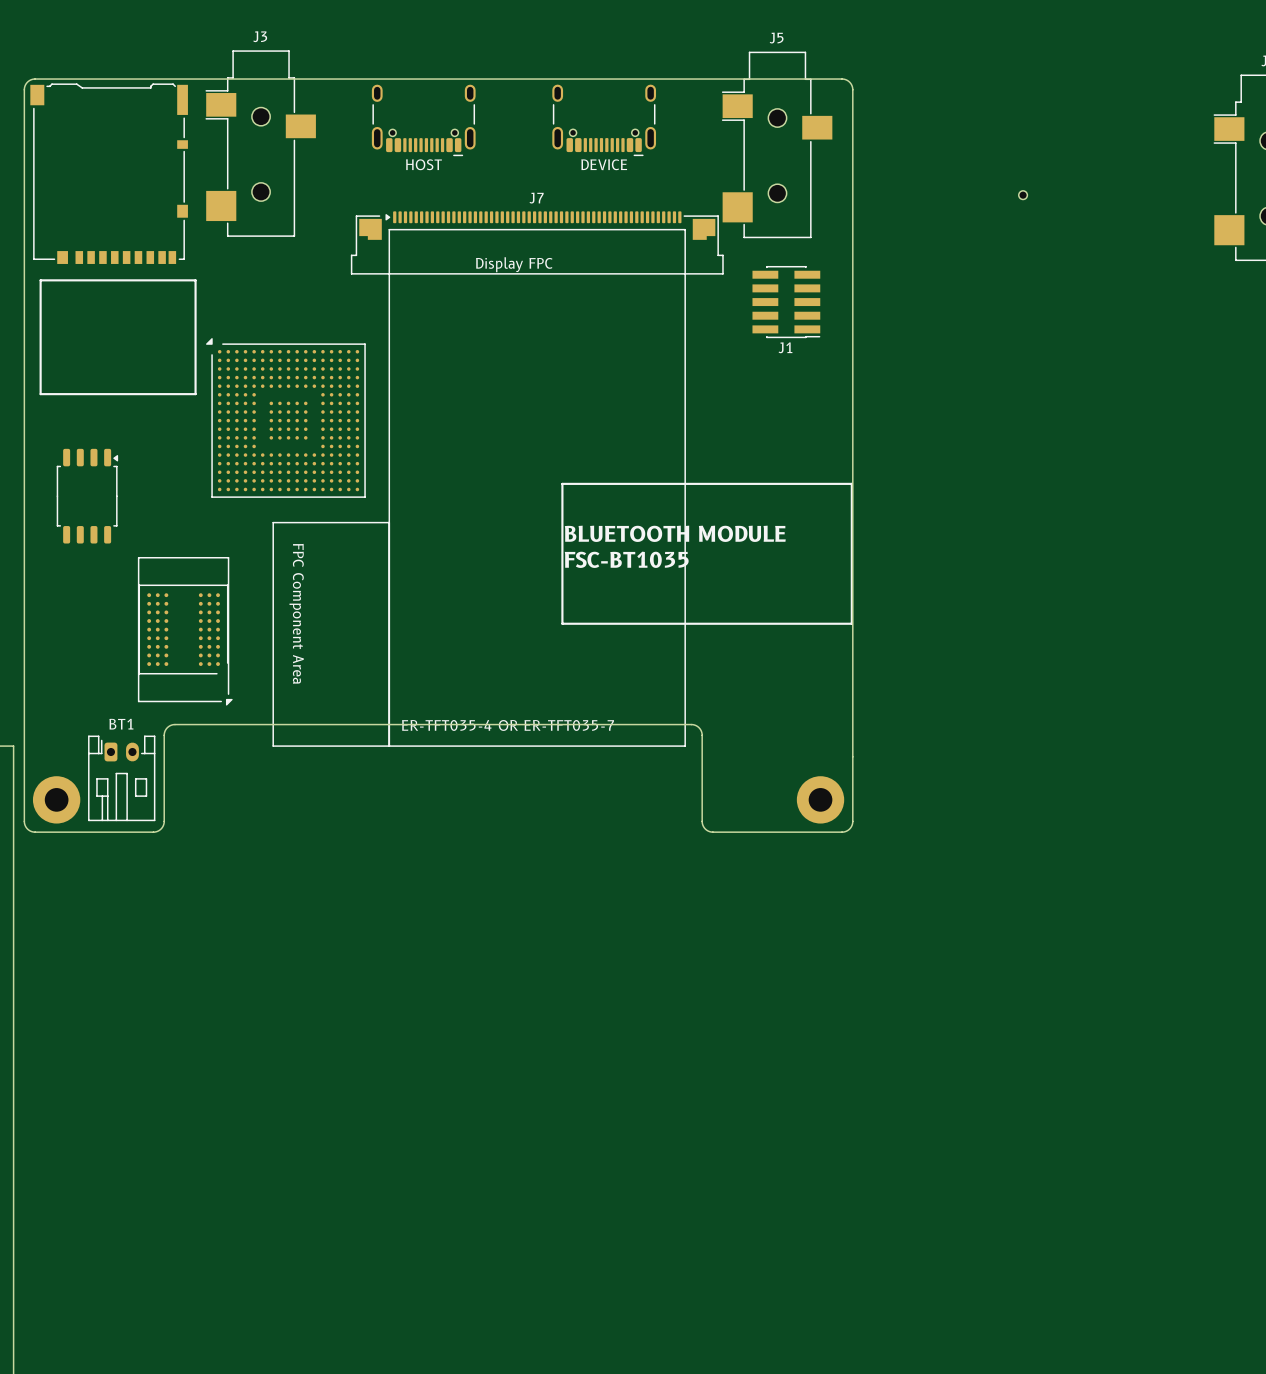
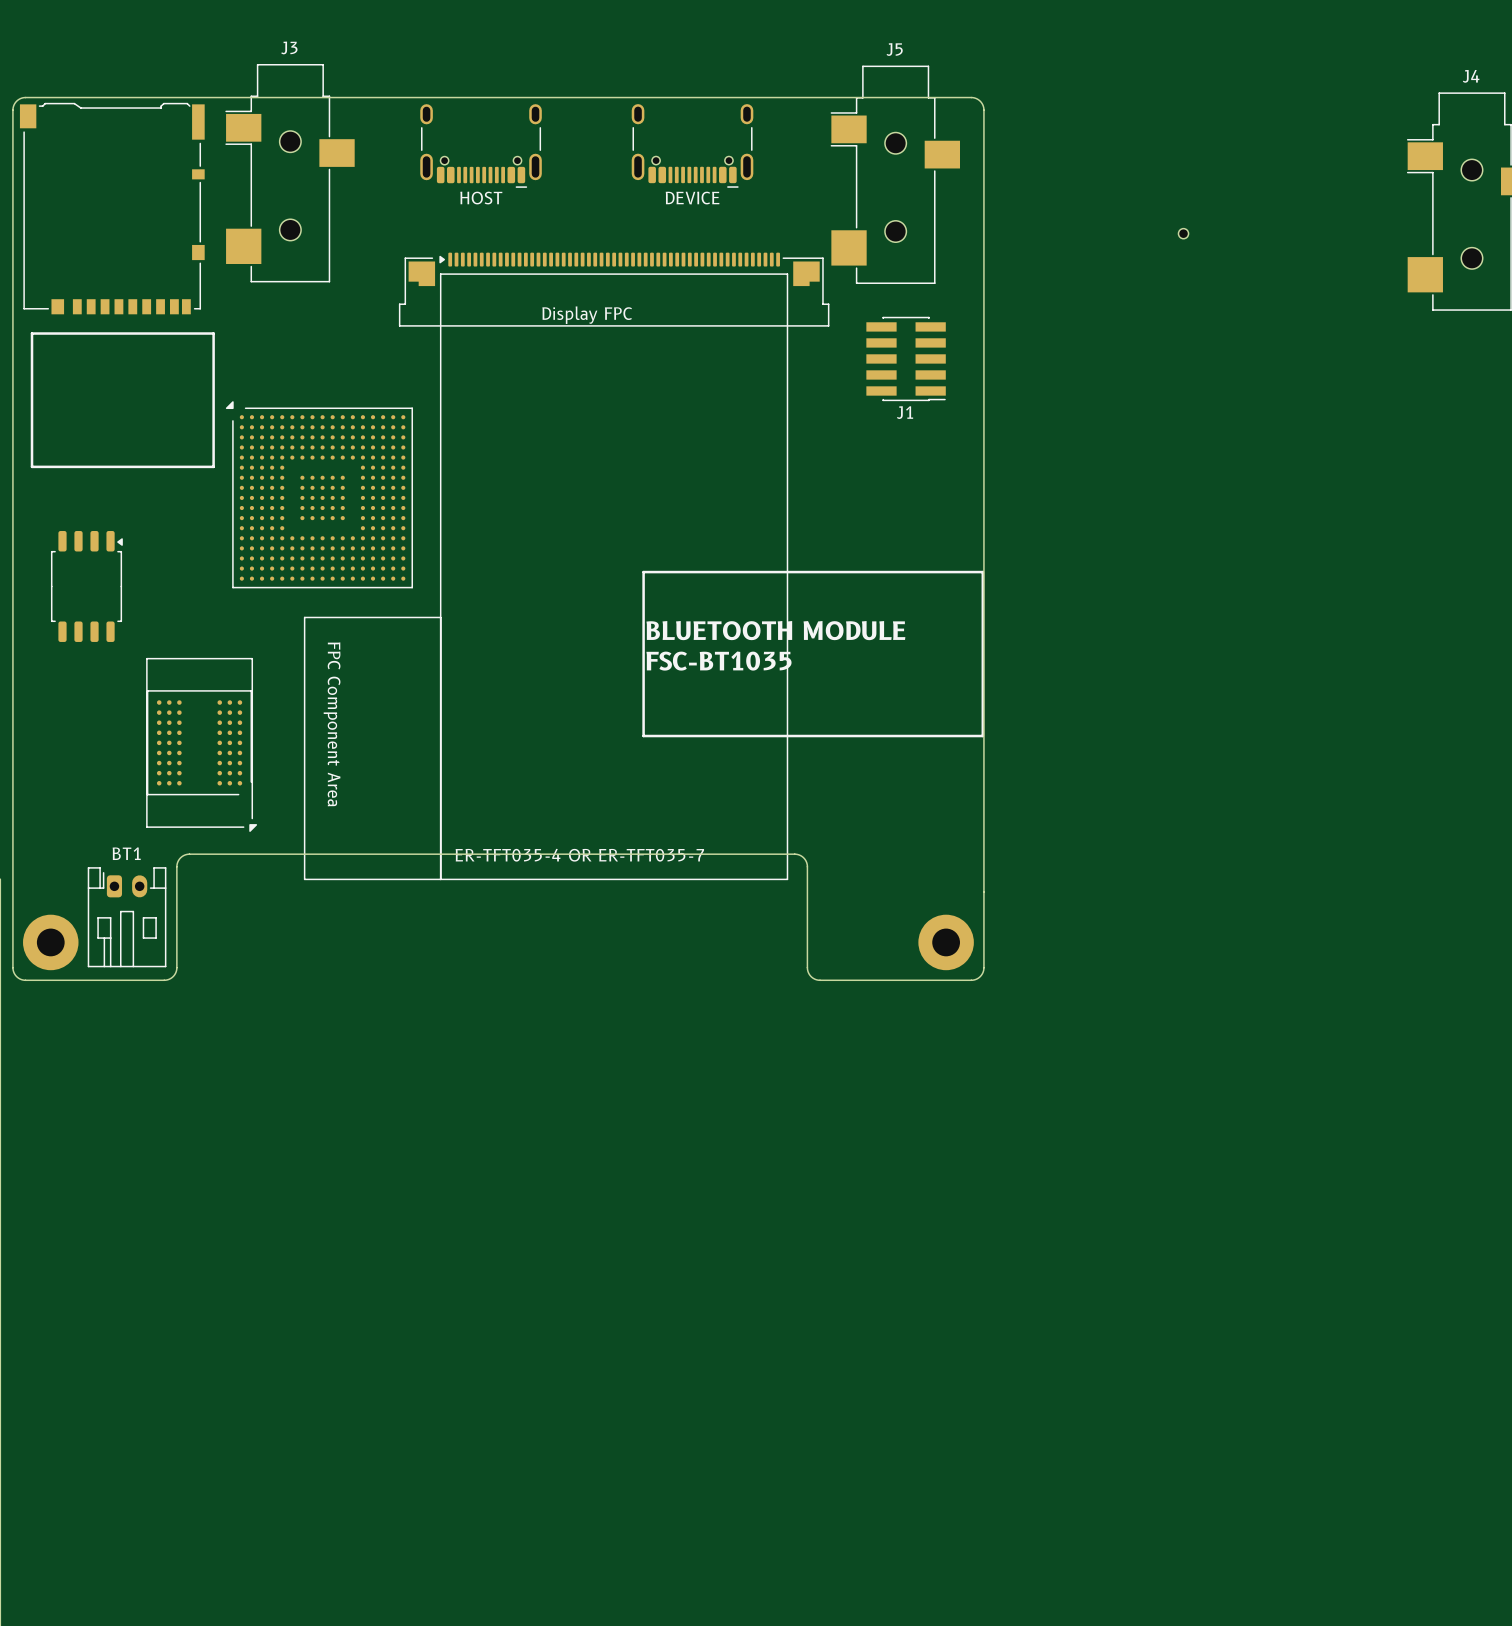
J7: (537, 242) -> none
part: none -> (614, 289)

